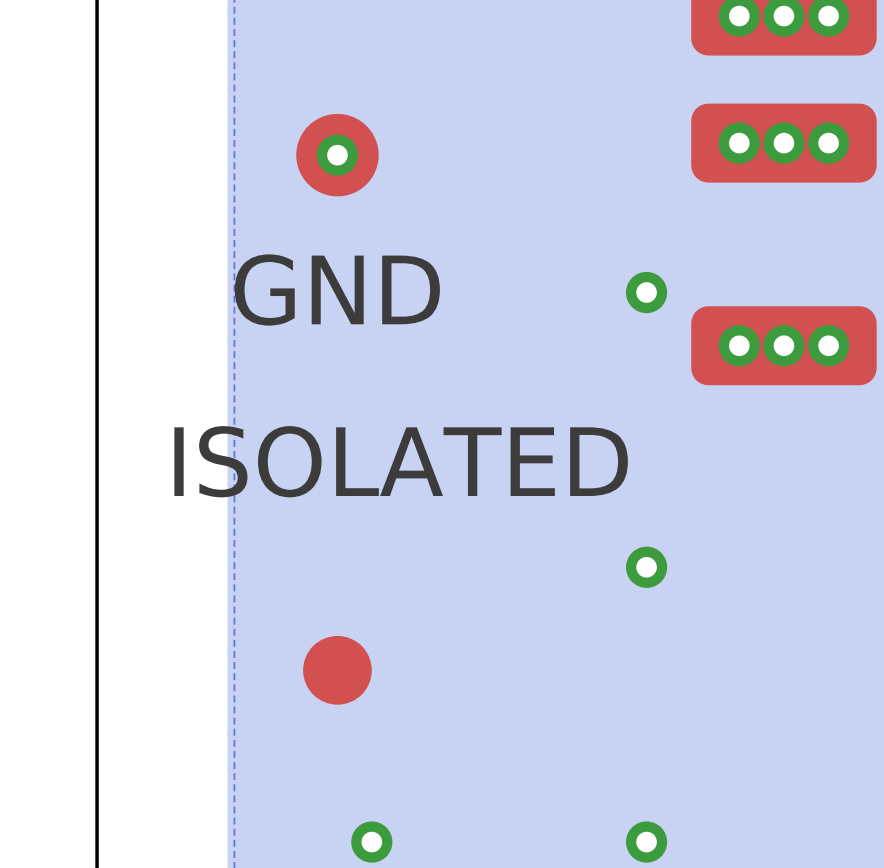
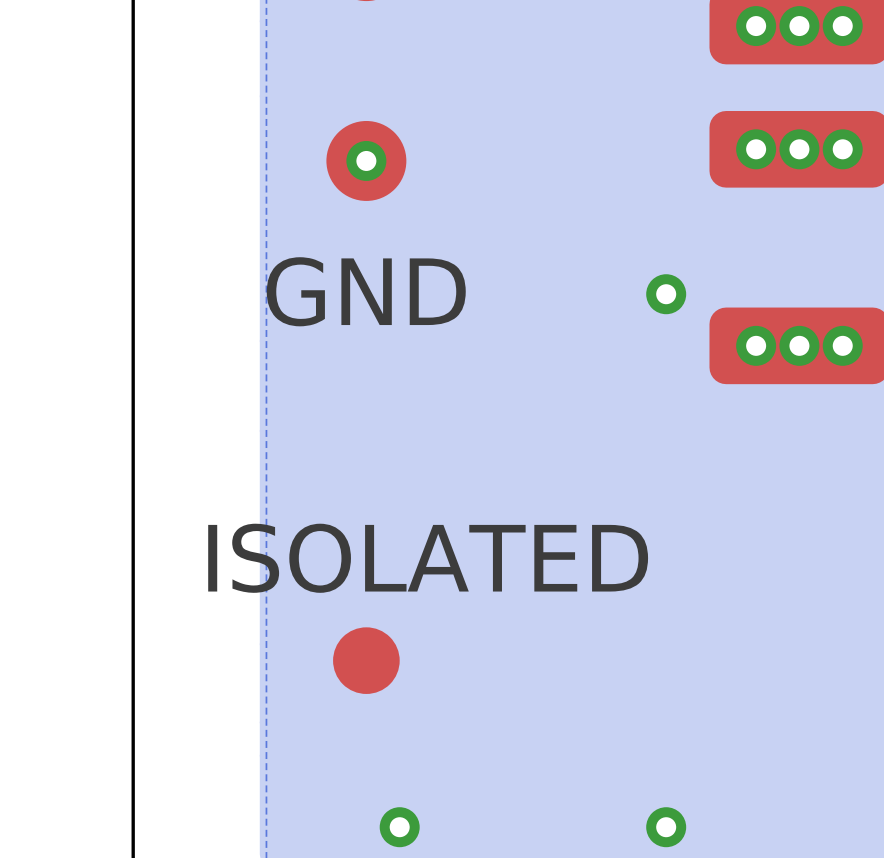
text position: ISOLATED (401, 461) -> ISOLATED (428, 558)
via: (646, 567) -> none

